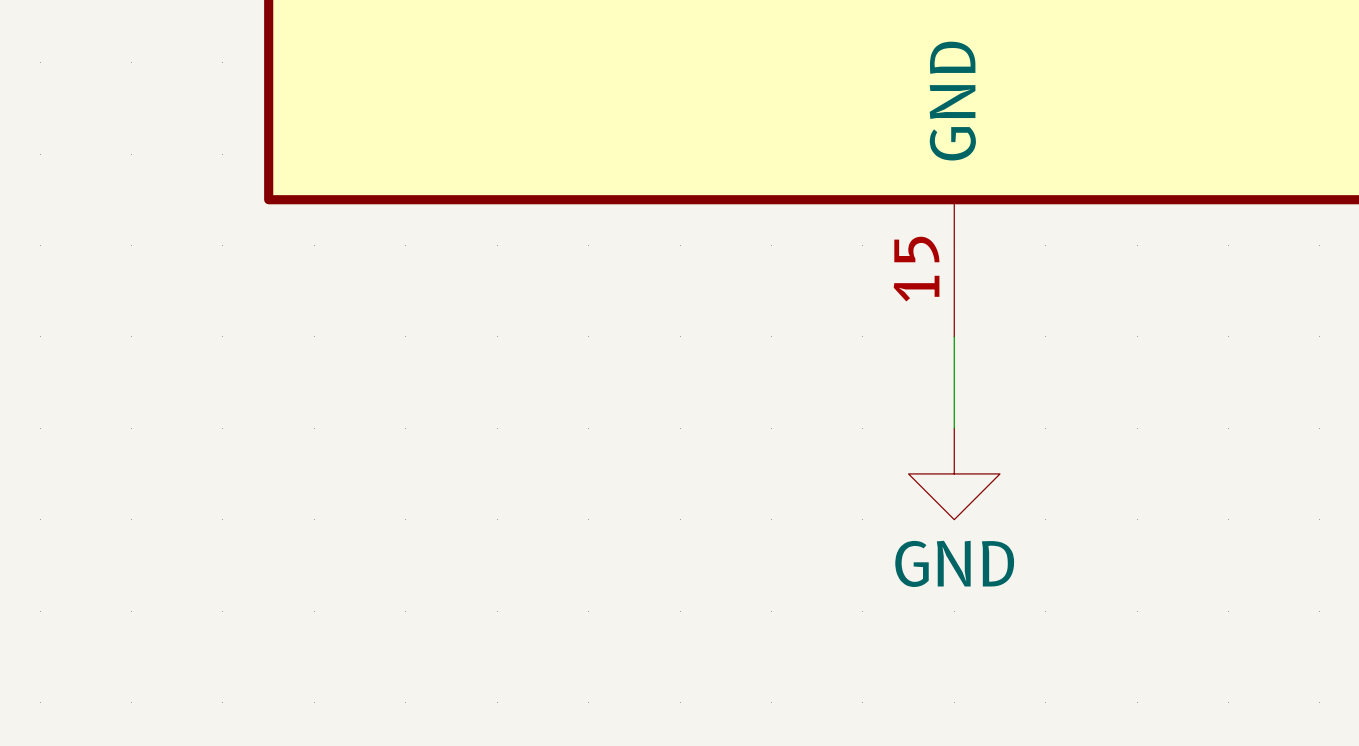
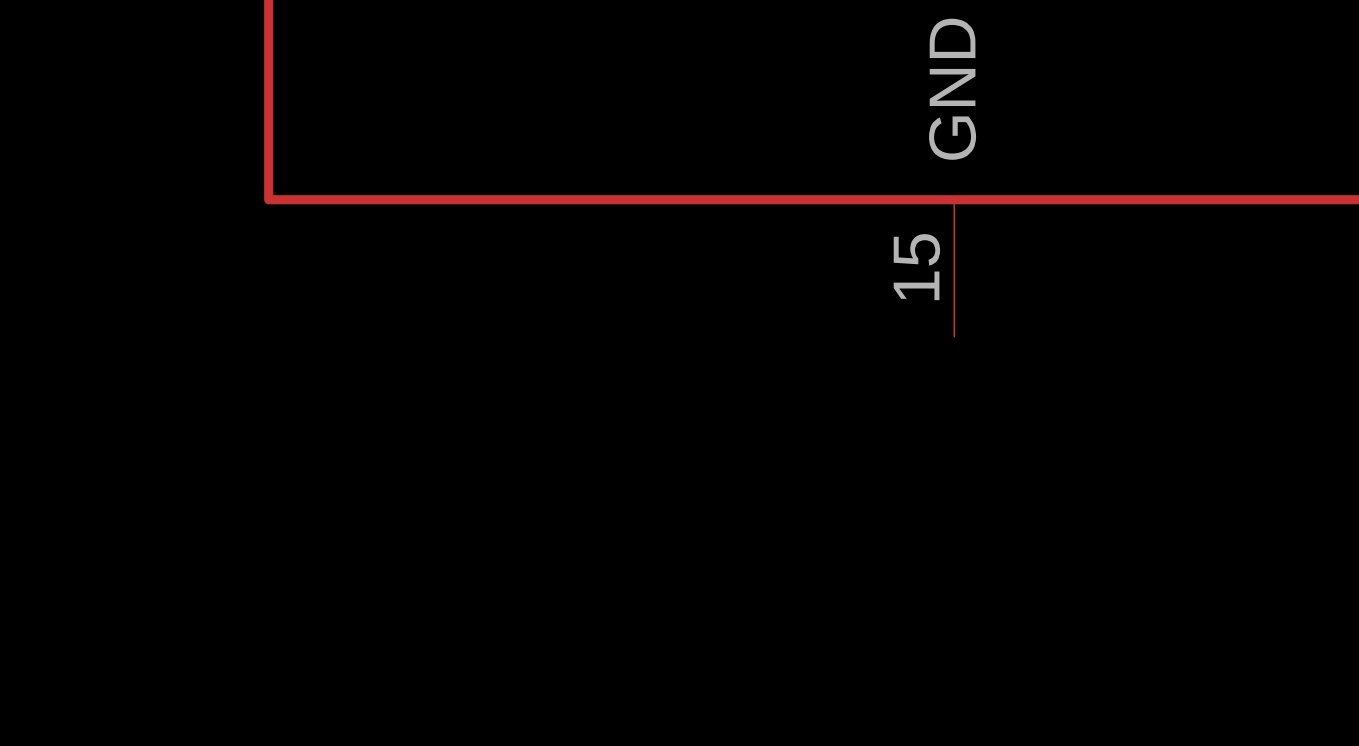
wire: (954, 336) (954, 428) -> none
power symbol: GND (954, 473) -> none

